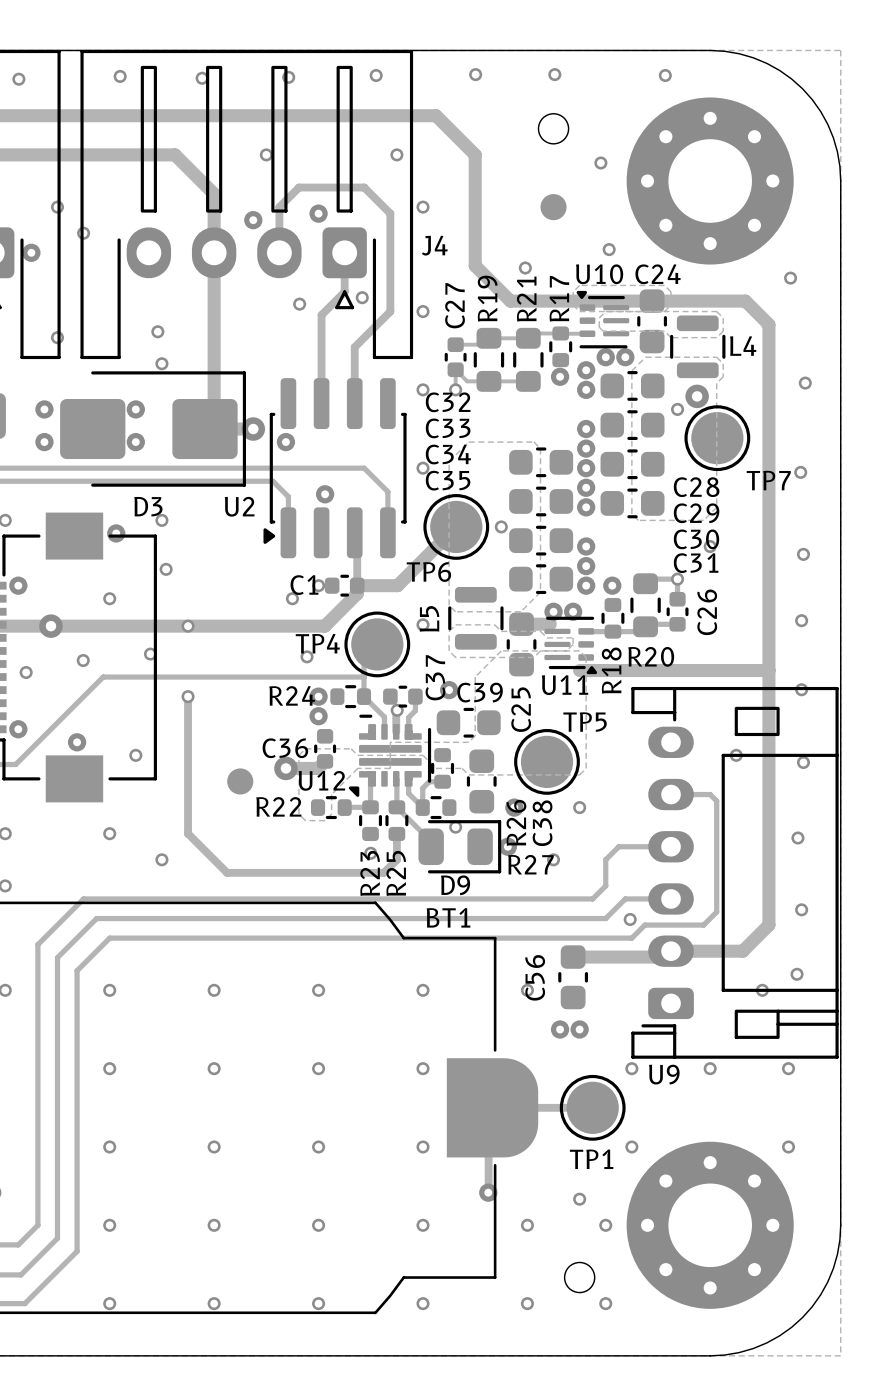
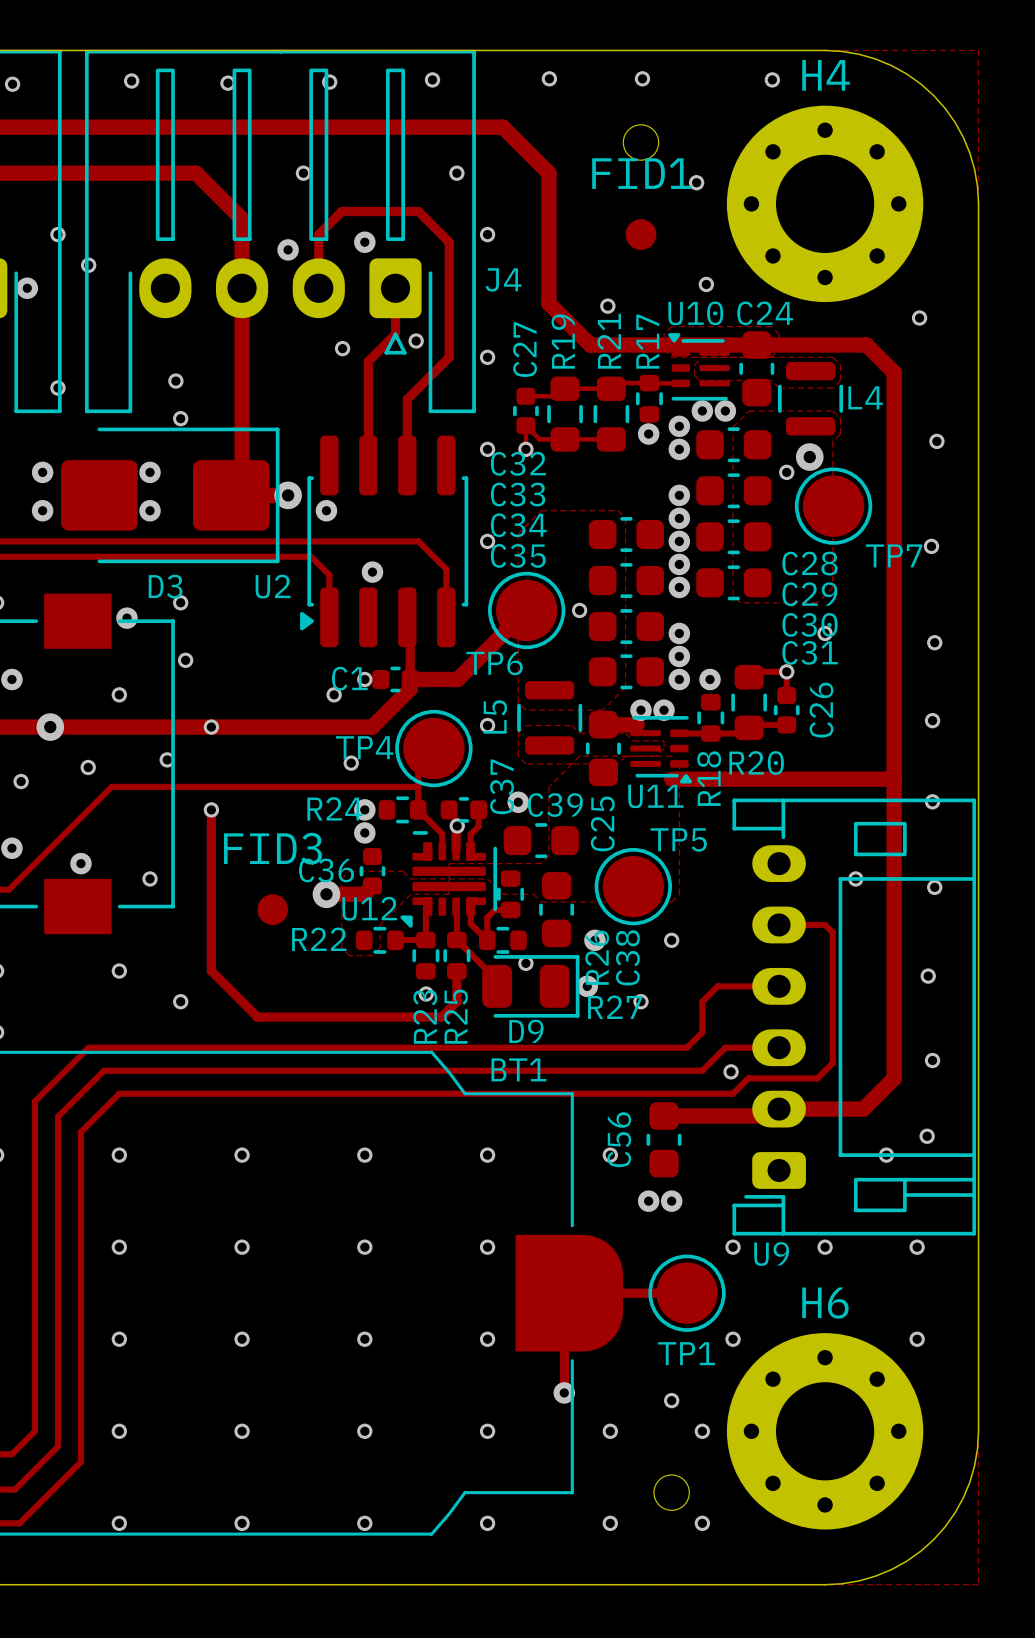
H4 name: none -> H4 (826, 75)
FID1 name: none -> FID1 (641, 173)
FID3 name: none -> FID3 (272, 848)
H6 name: none -> H6 (825, 1303)

